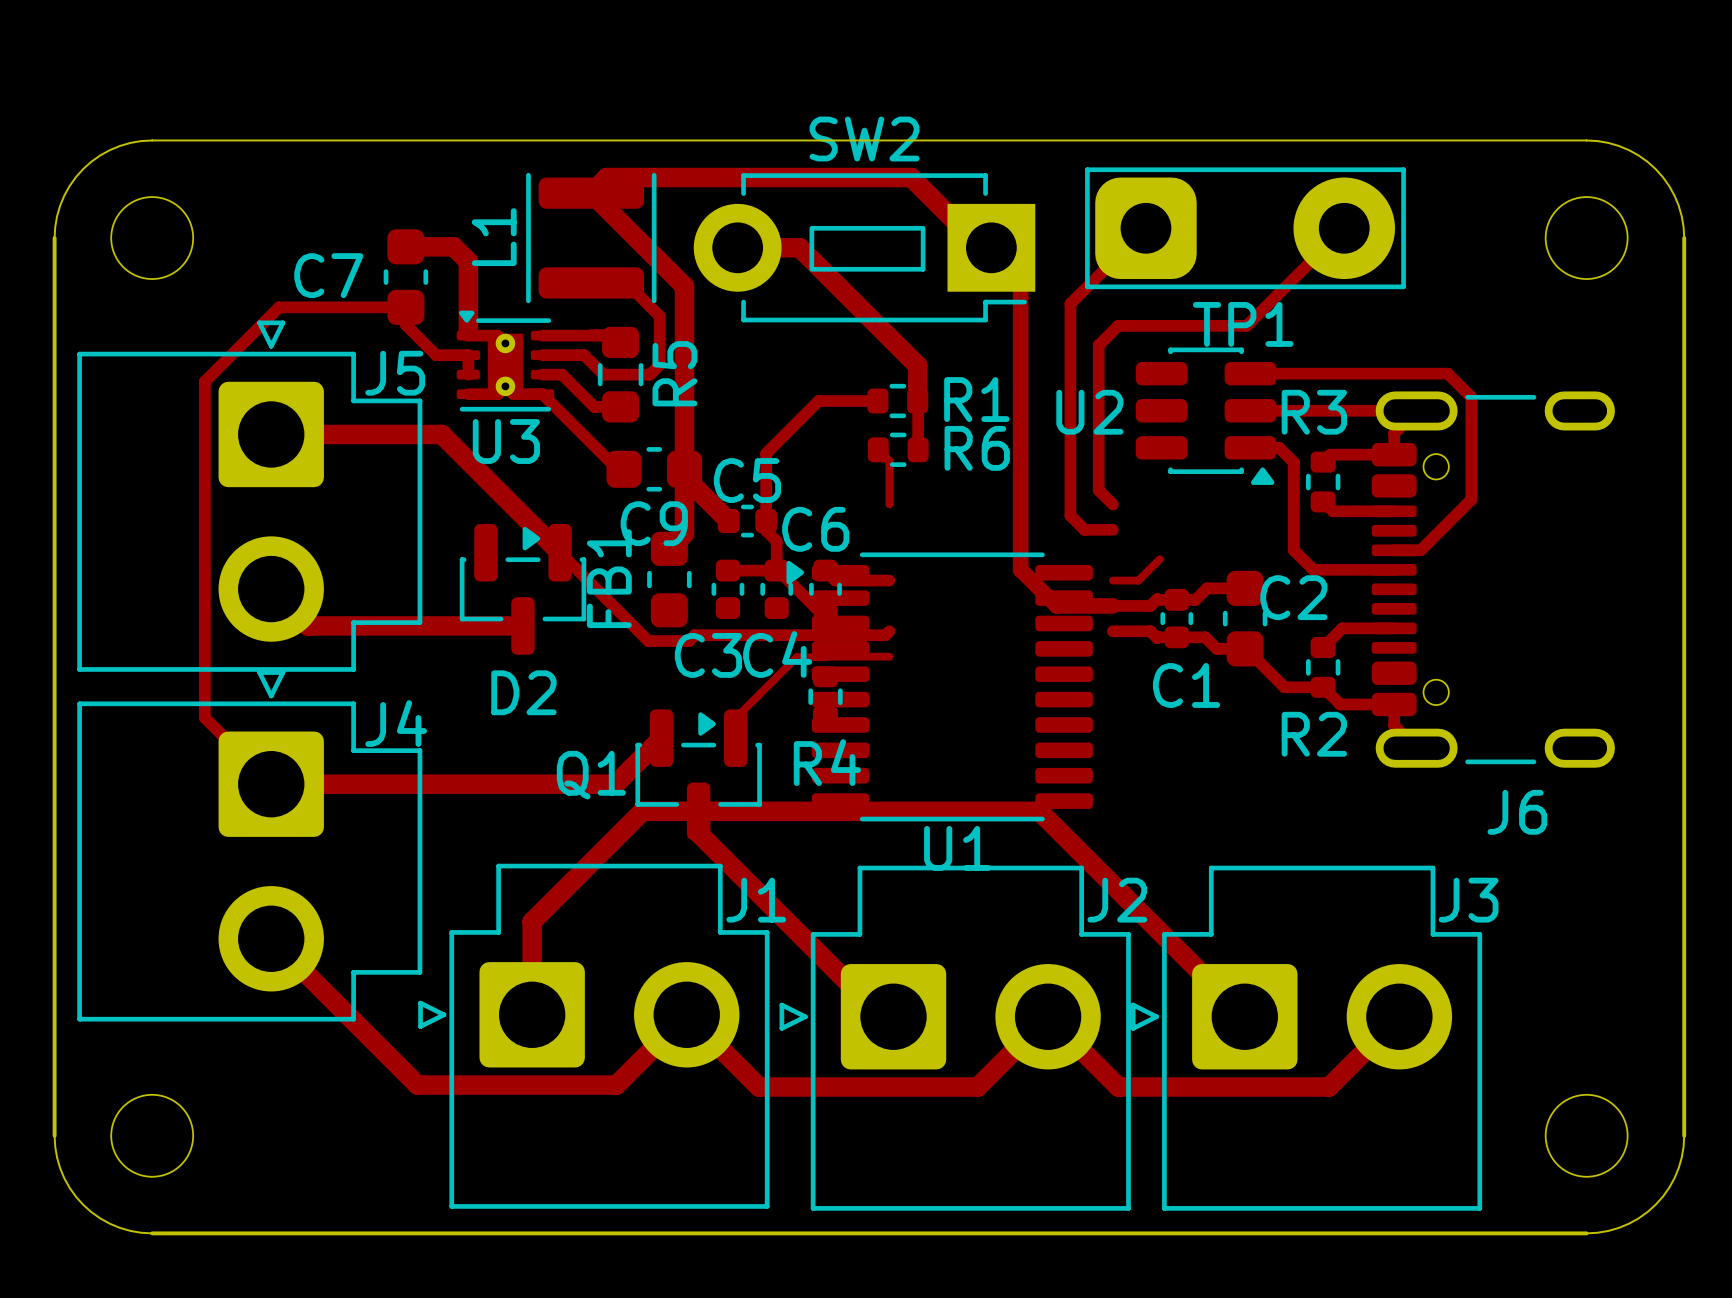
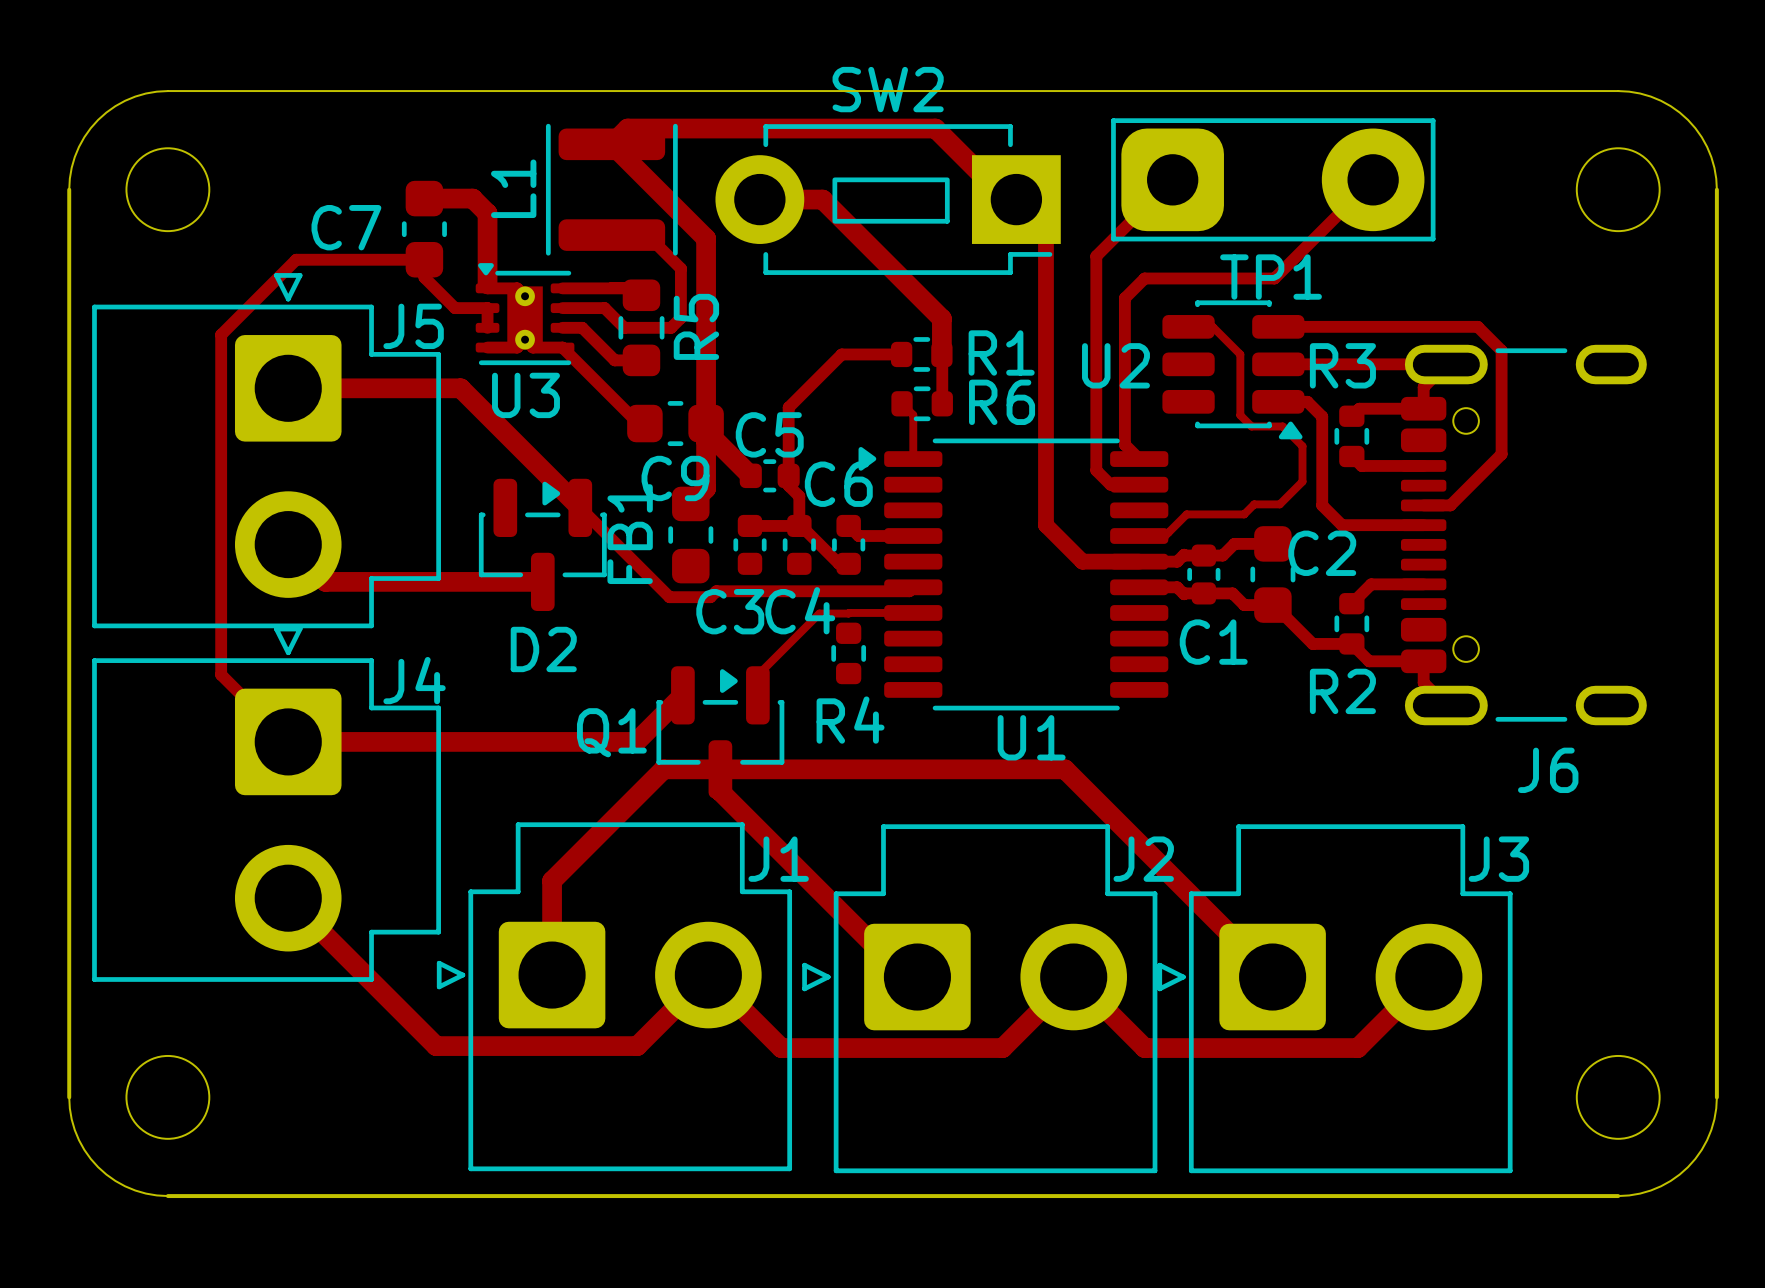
track: none -> (1188, 326) (1212, 326) (1240, 354) (1240, 415) (1251, 426) (1282, 426) (1302, 446) (1302, 481) (1279, 504) (1254, 504) (1244, 514) (1186, 514)
U1 position: (939, 686) -> (1013, 574)

